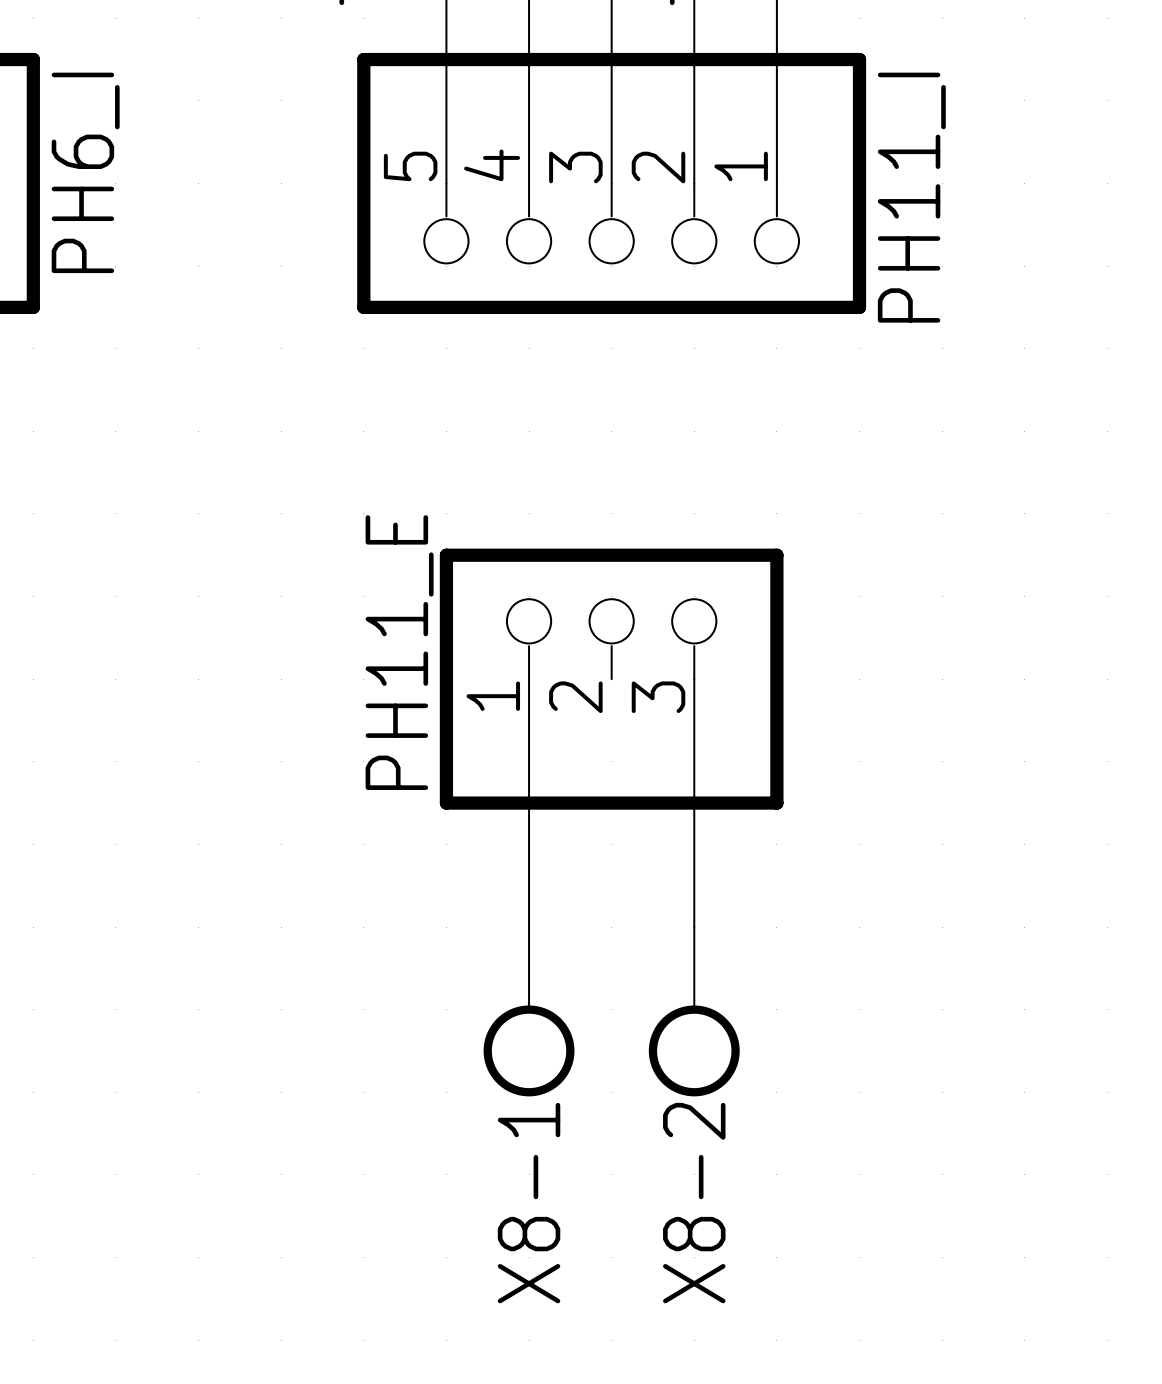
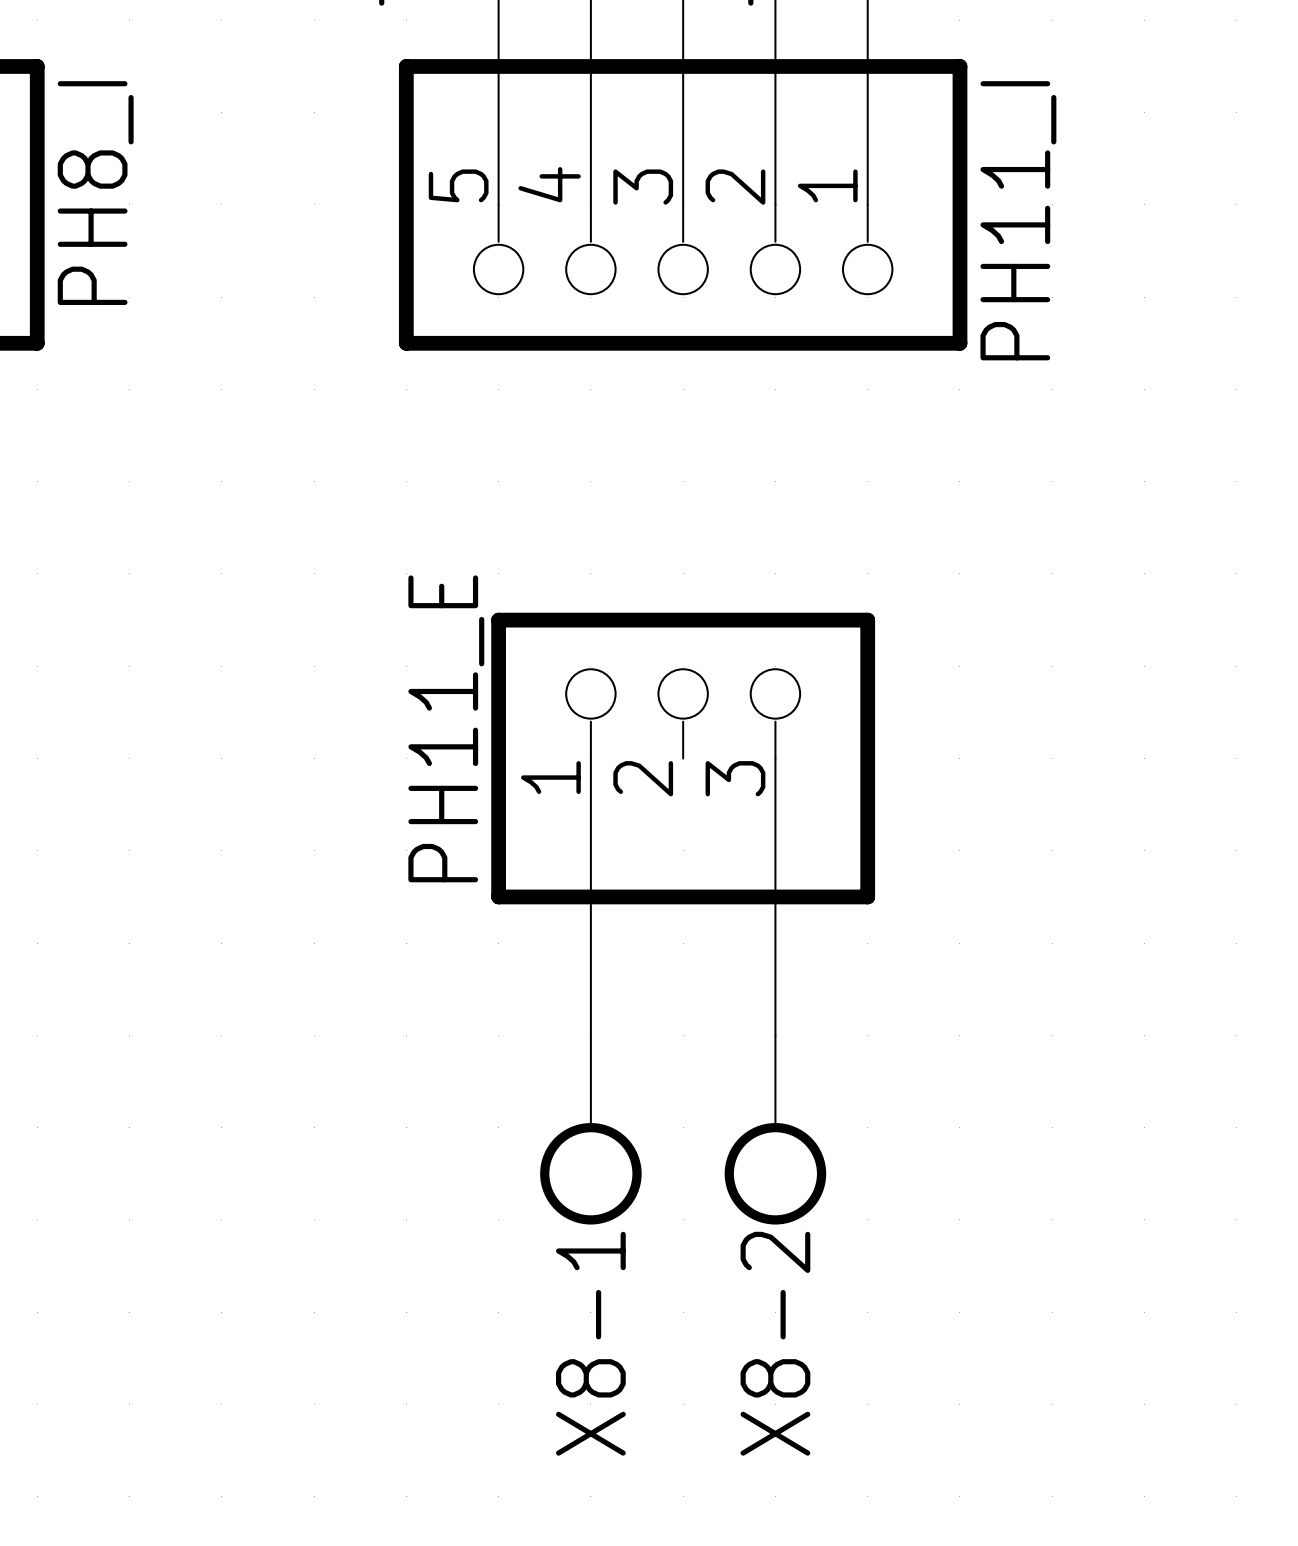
PH6_I name: PH6_I (85, 172) -> PH8_I (95, 193)

